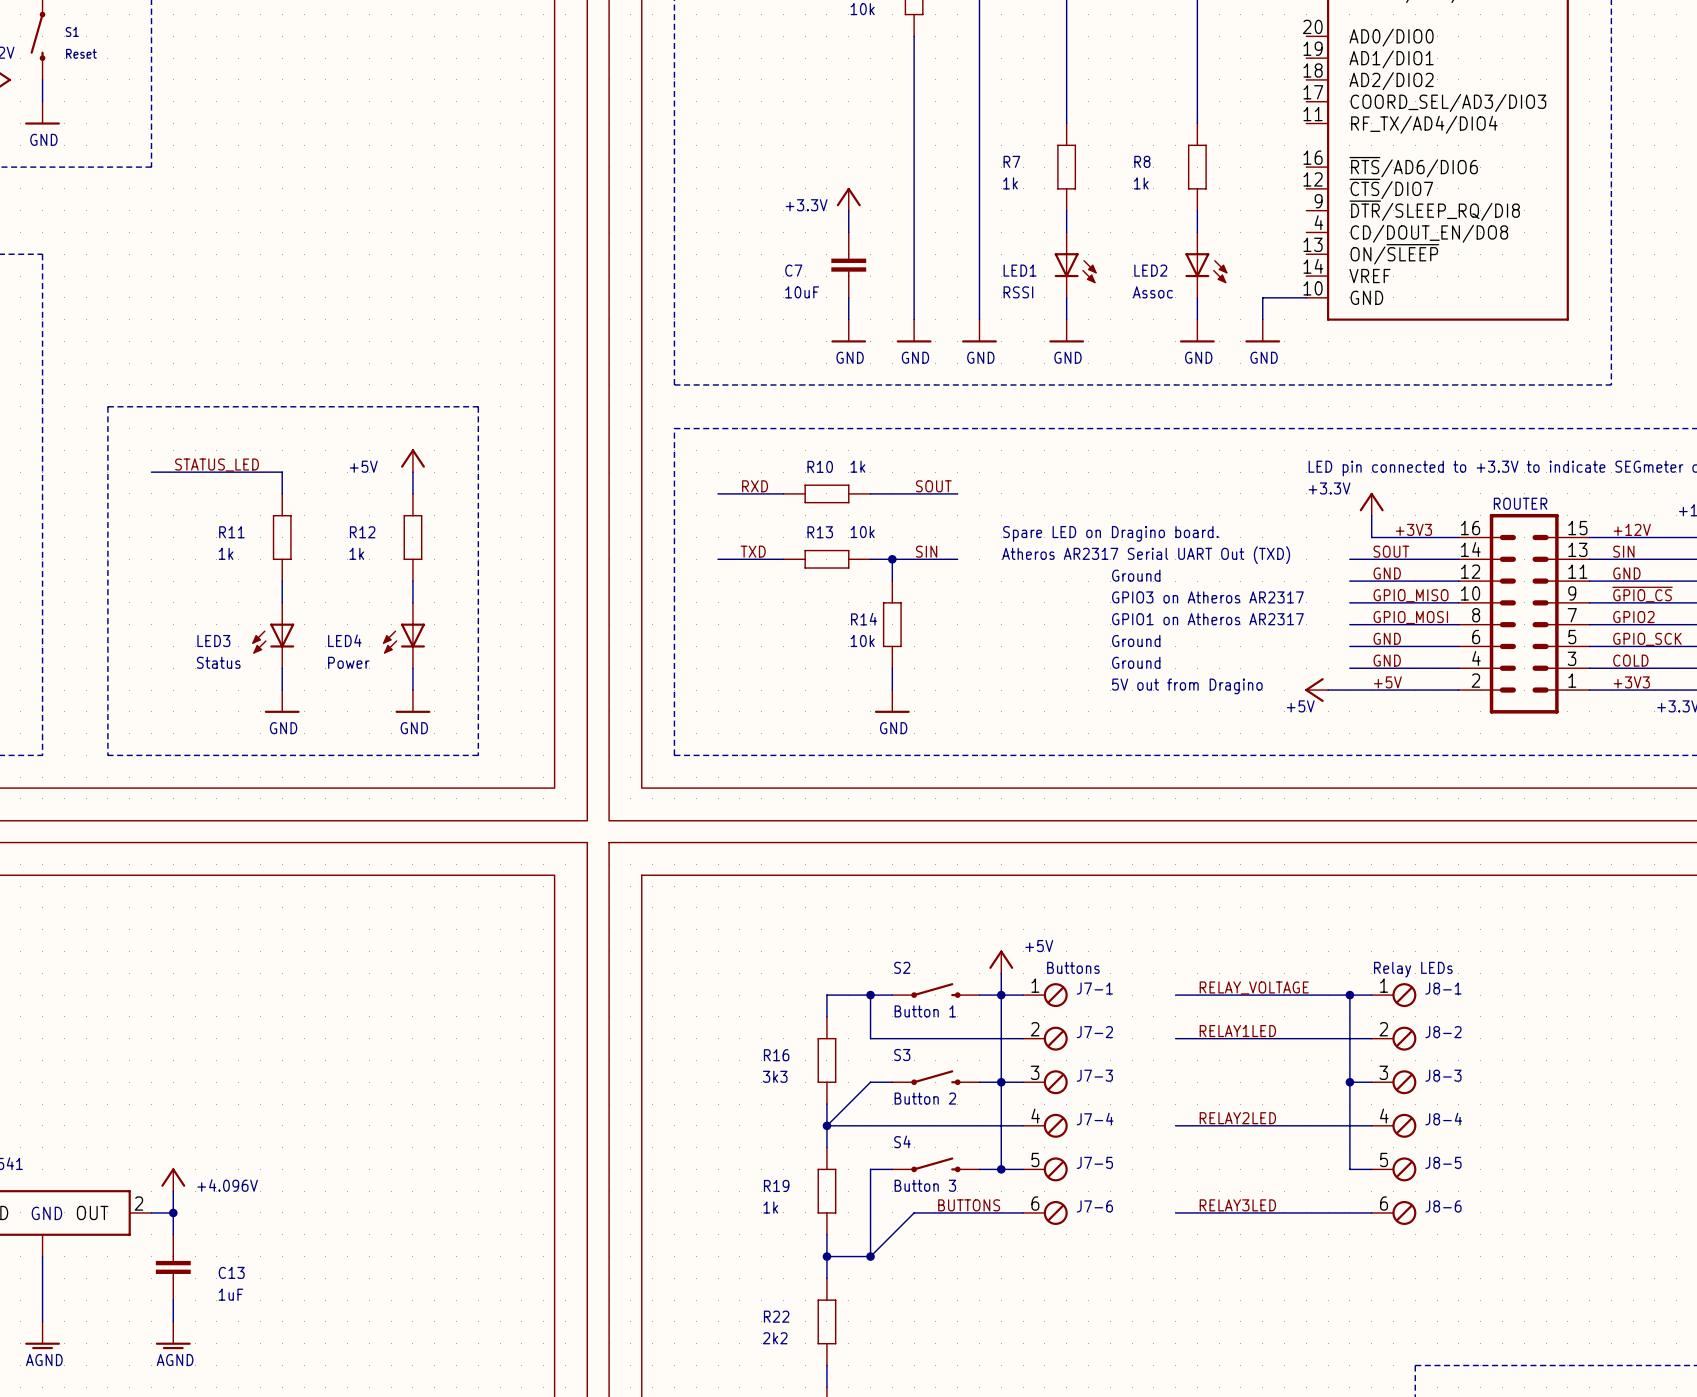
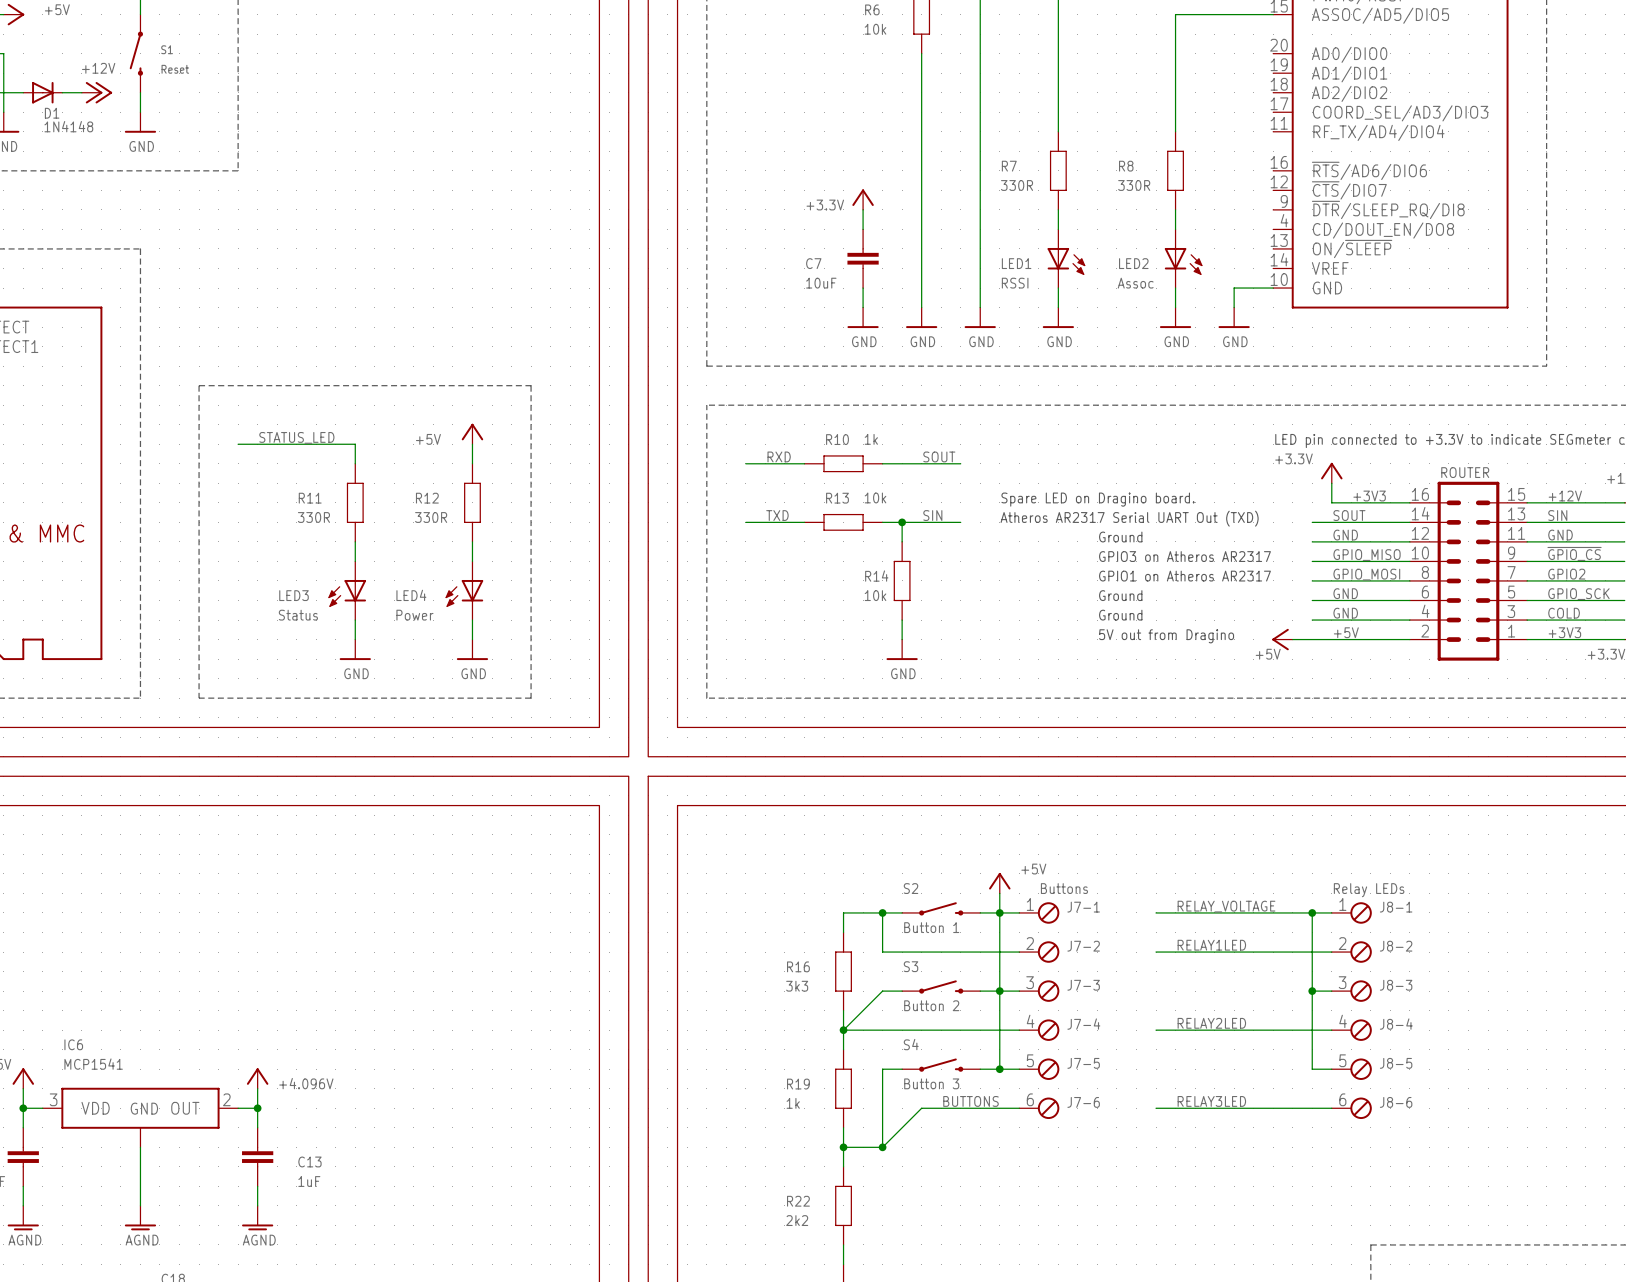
R7 value: 1k (1010, 183) -> 330R (1017, 185)
R8 value: 1k (1141, 183) -> 330R (1134, 185)
R11 value: 1k (226, 553) -> 330R (313, 517)
R12 value: 1k (356, 553) -> 330R (431, 517)

